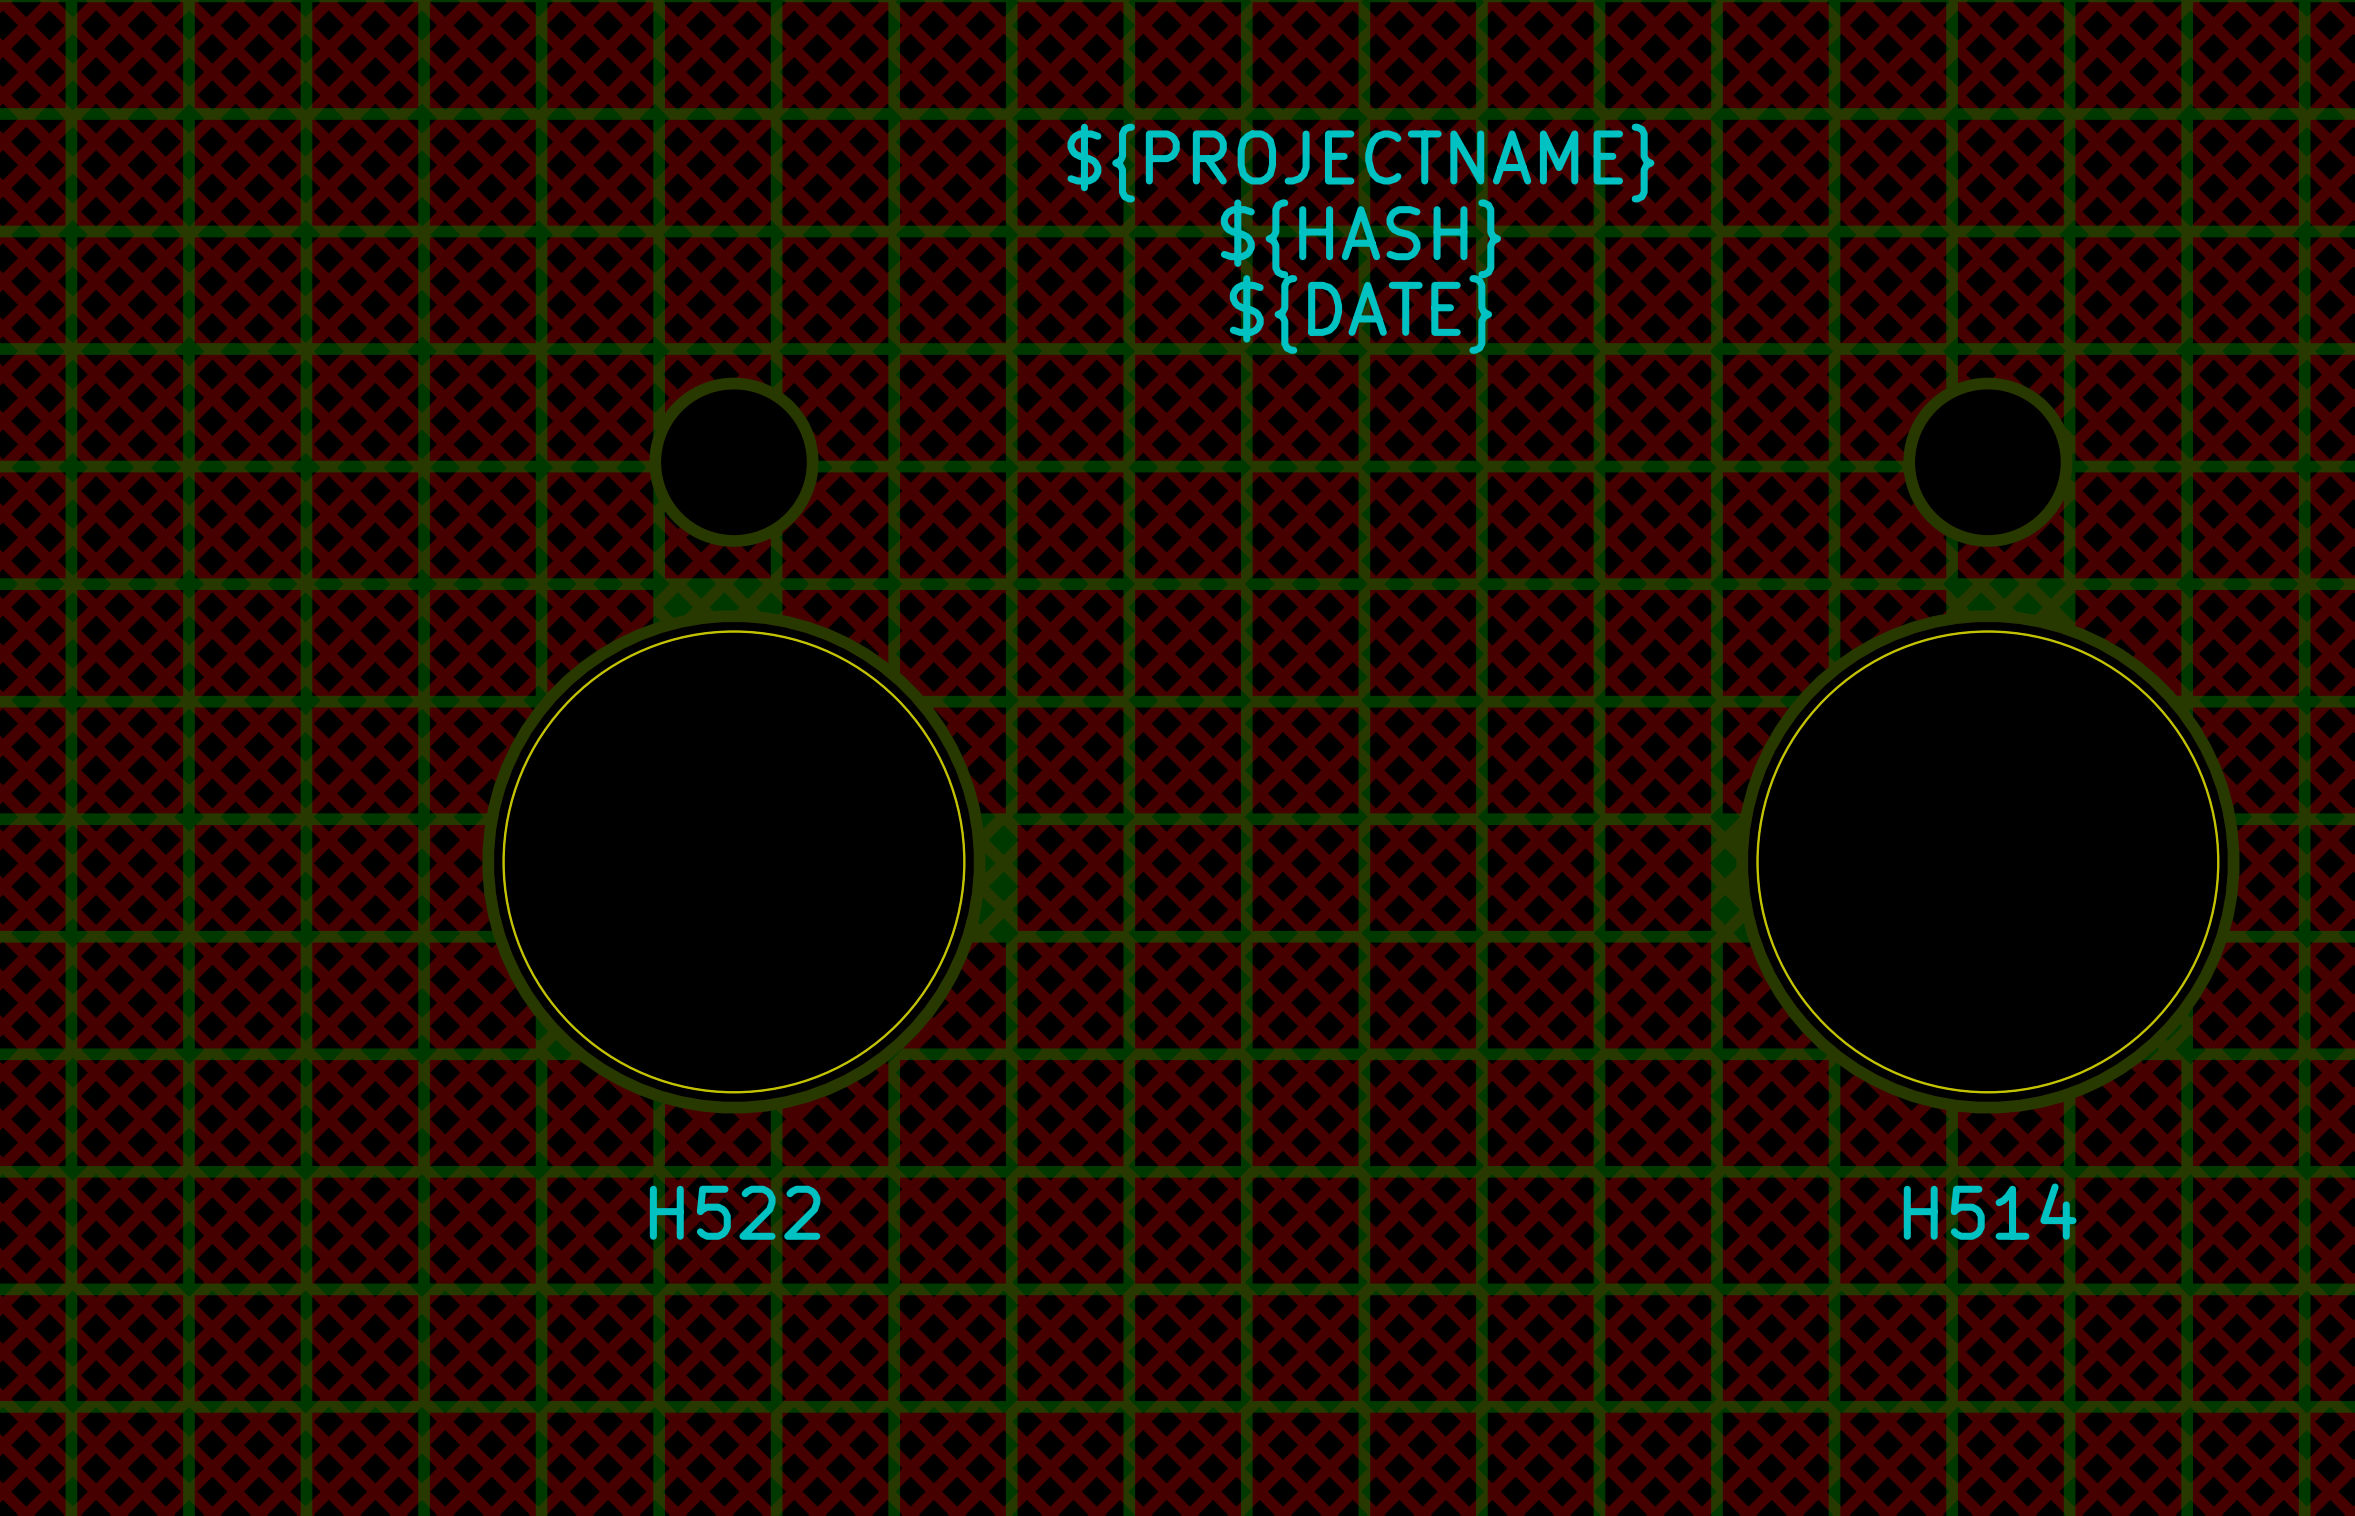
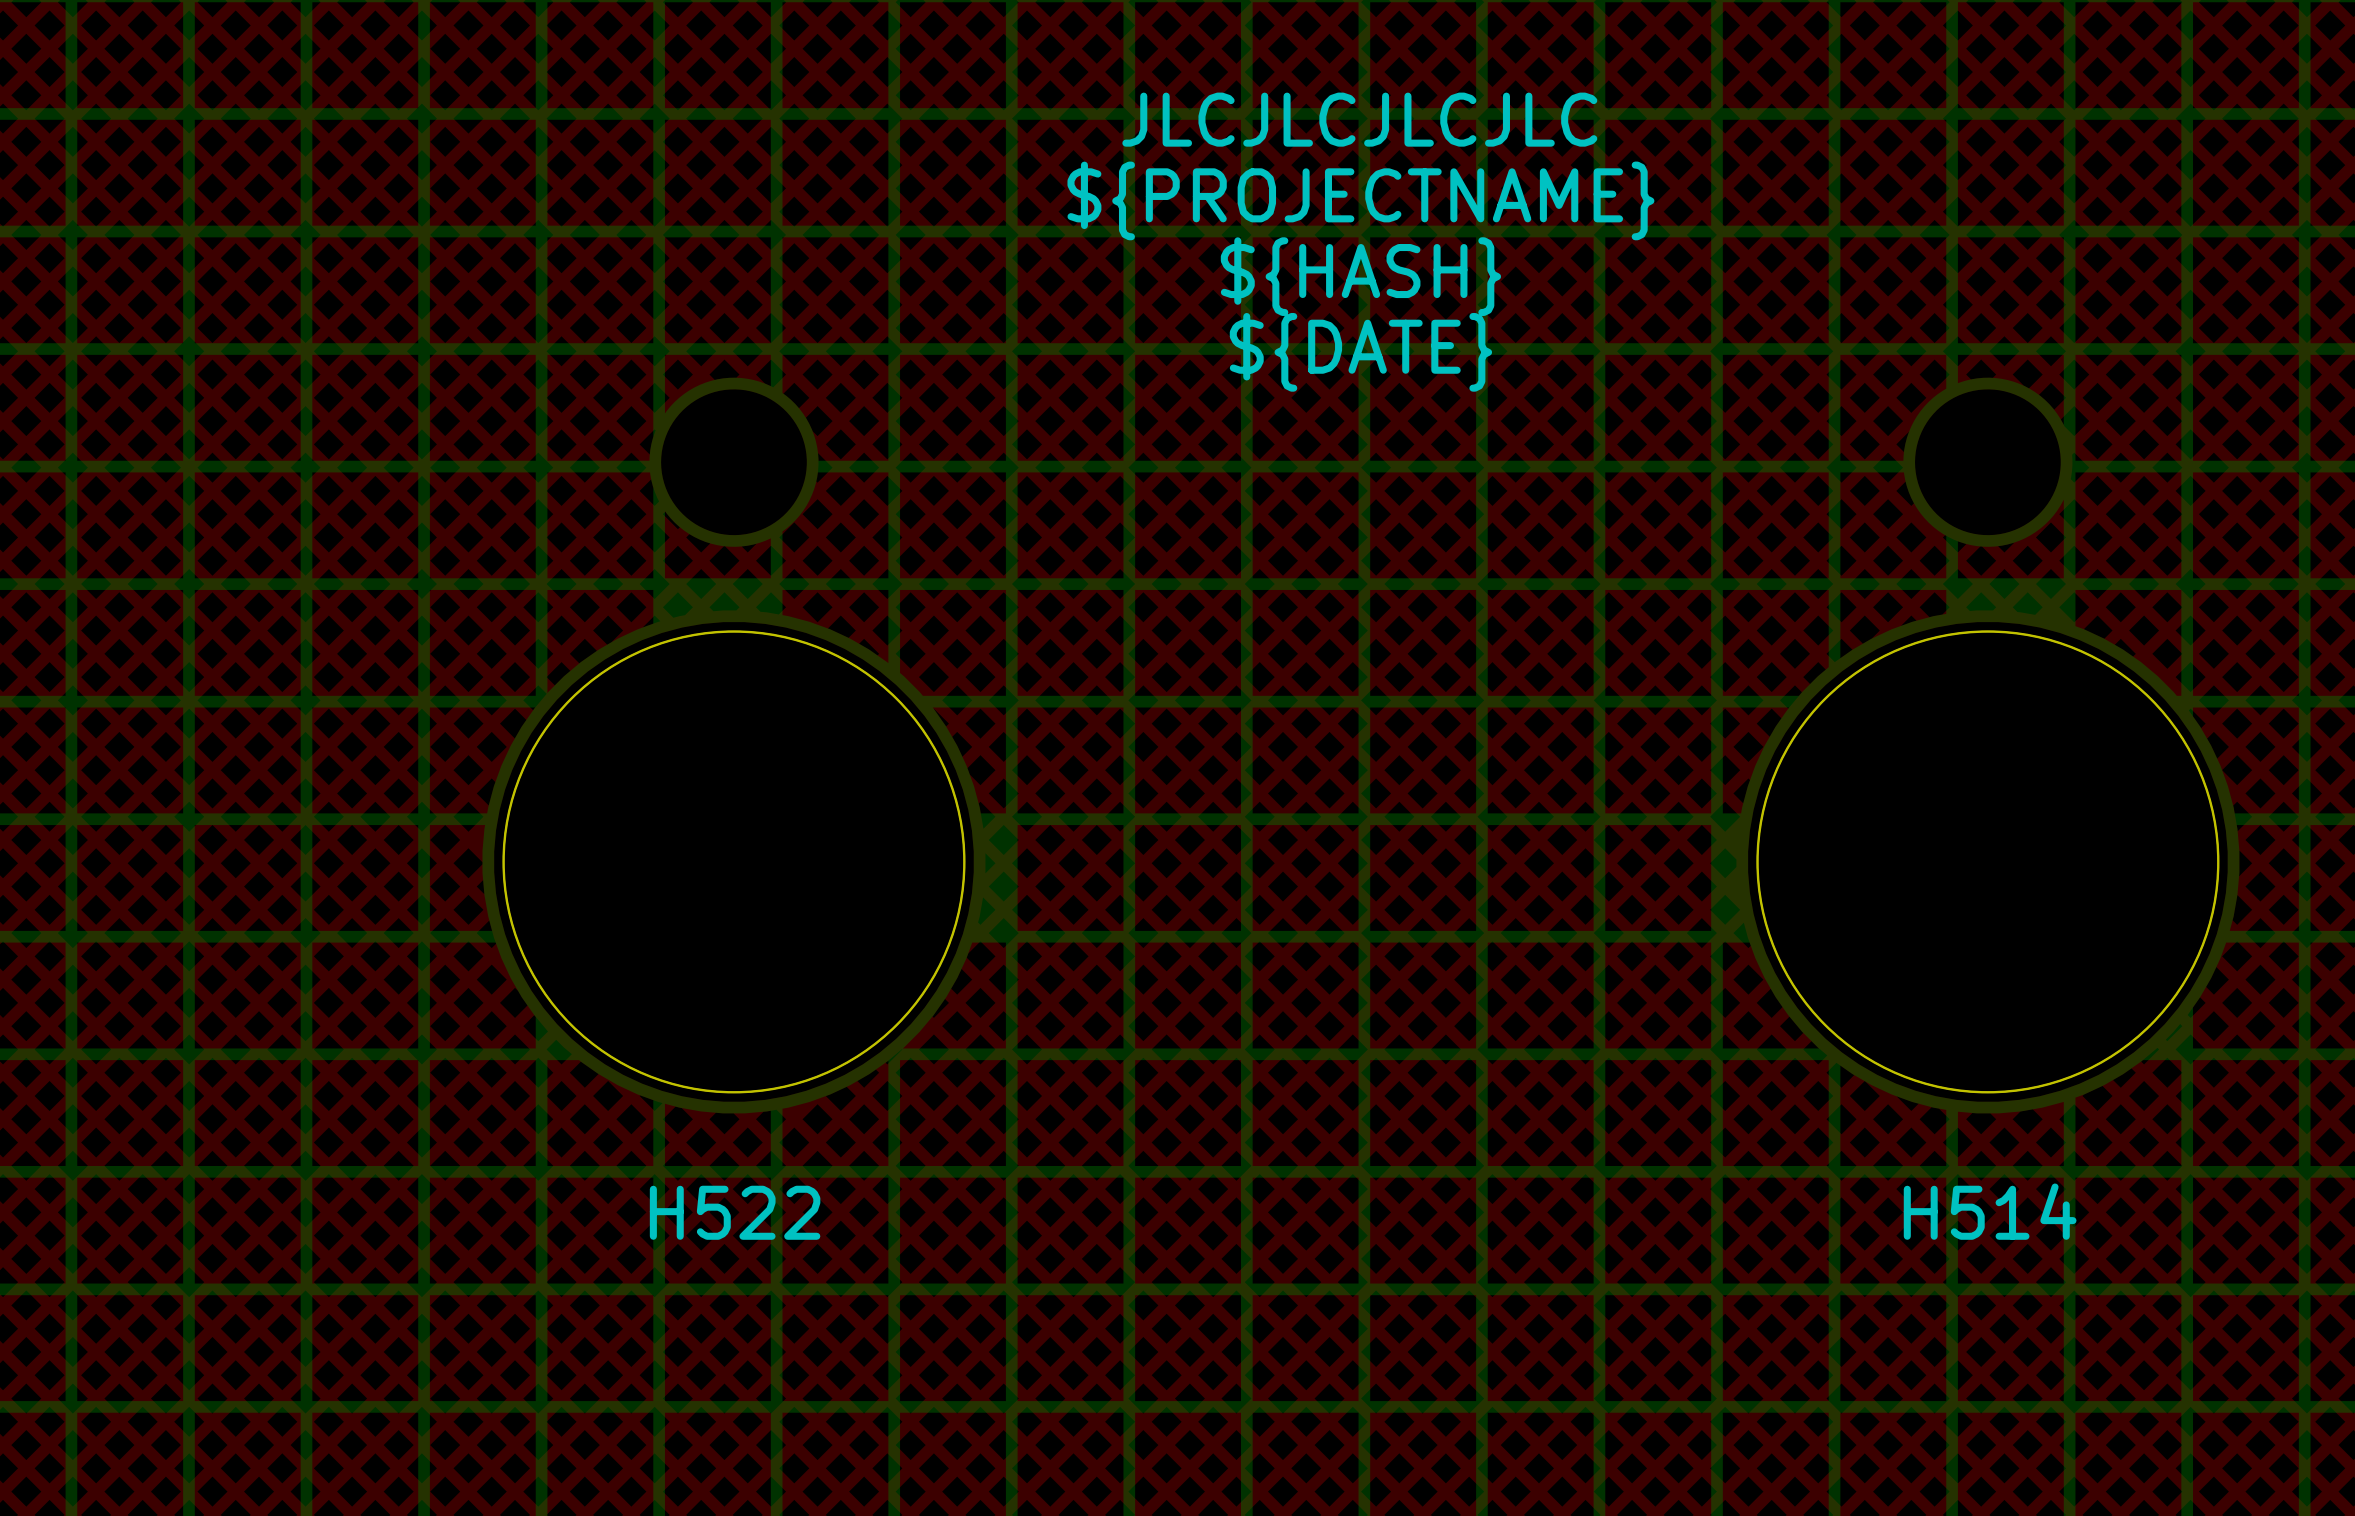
text: none -> JLCJLCJLCJLC (1359, 119)
text position: ${PROJECTNAME} (1360, 163) -> ${PROJECTNAME} (1360, 200)
text position: ${HASH} (1360, 238) -> ${HASH} (1360, 276)
text position: ${DATE} (1360, 314) -> ${DATE} (1360, 352)

